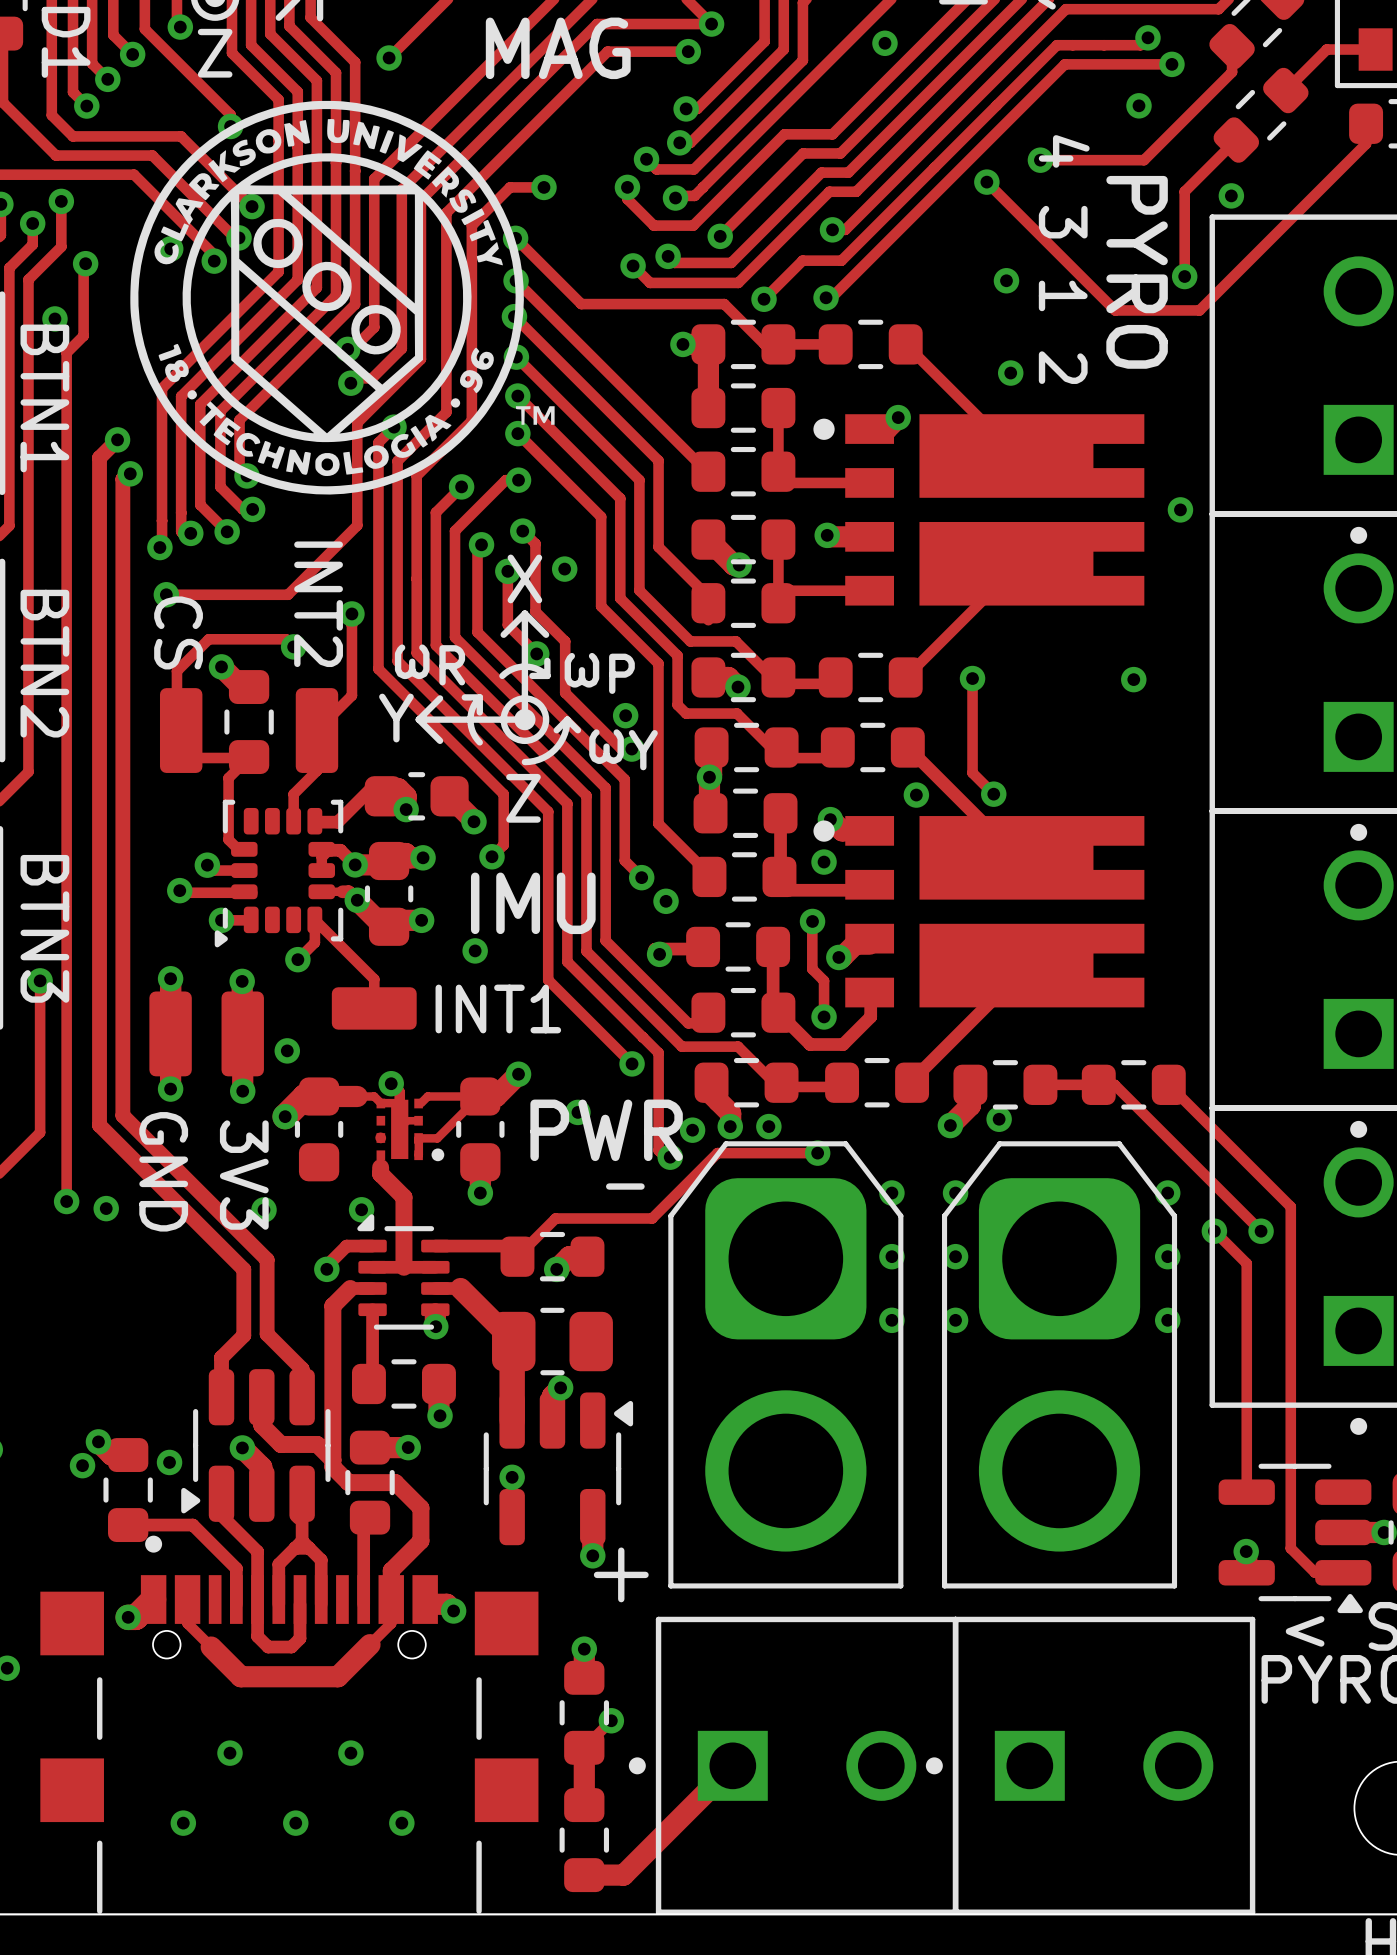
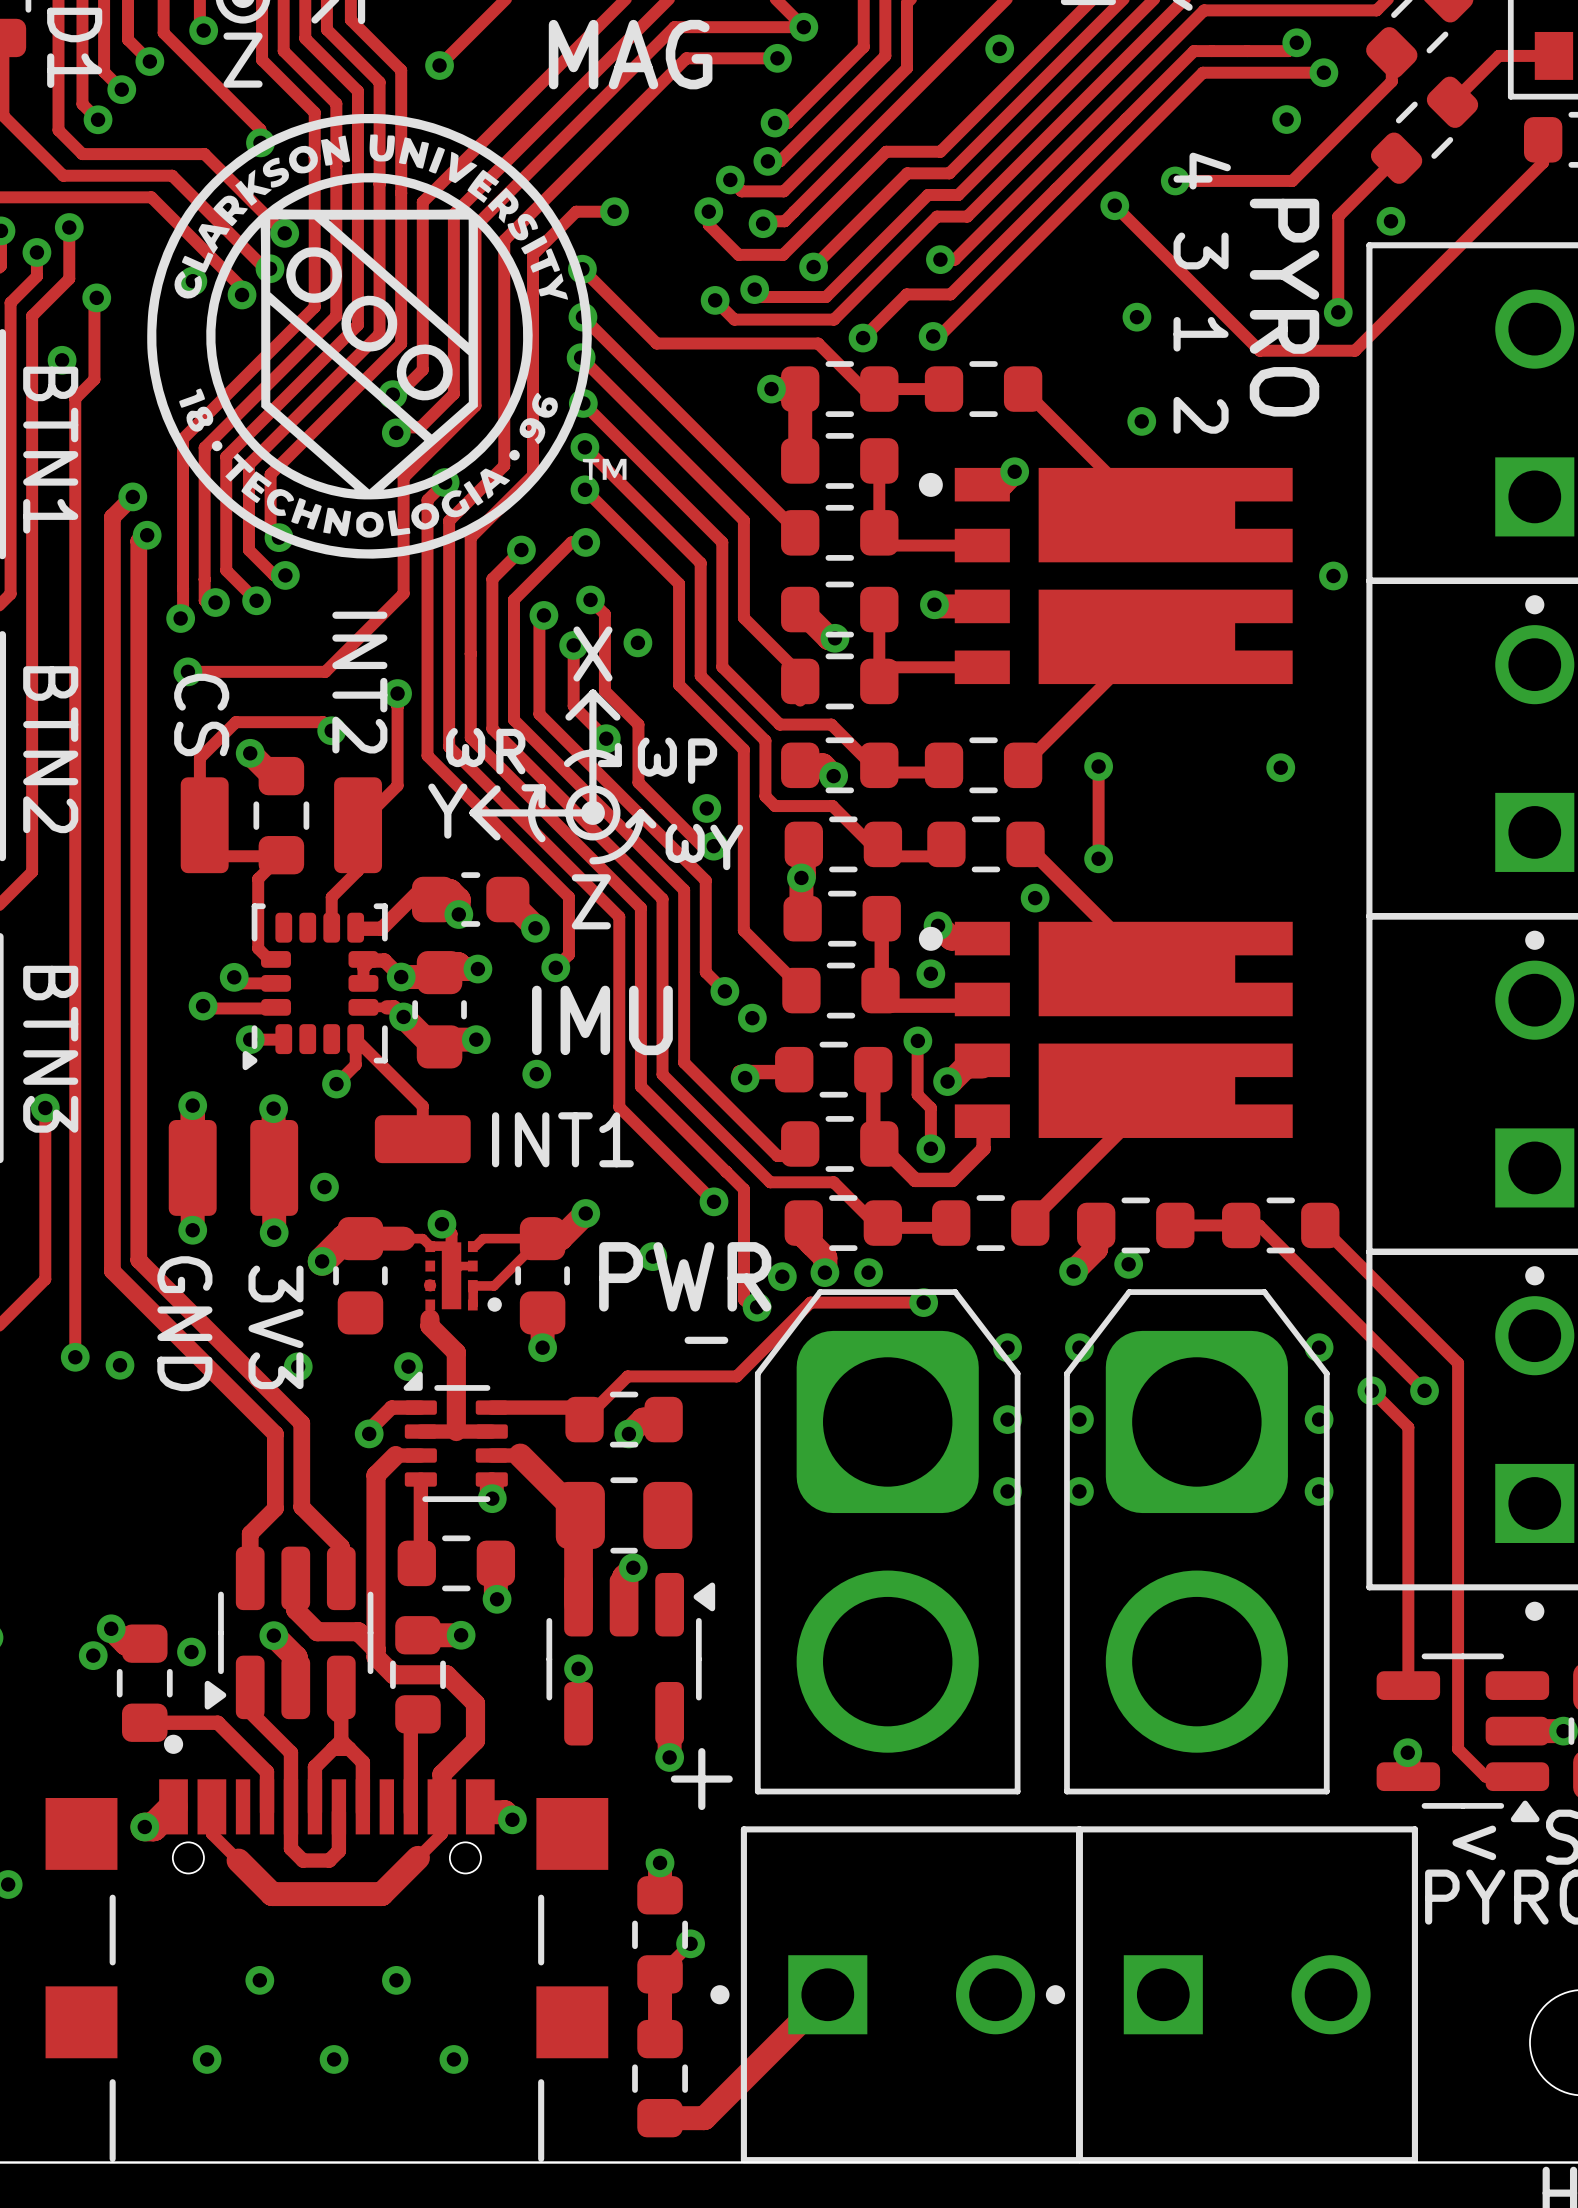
track: (972, 760) (972, 772) (993, 794) -> none
via position: (993, 794) -> (1098, 858)

